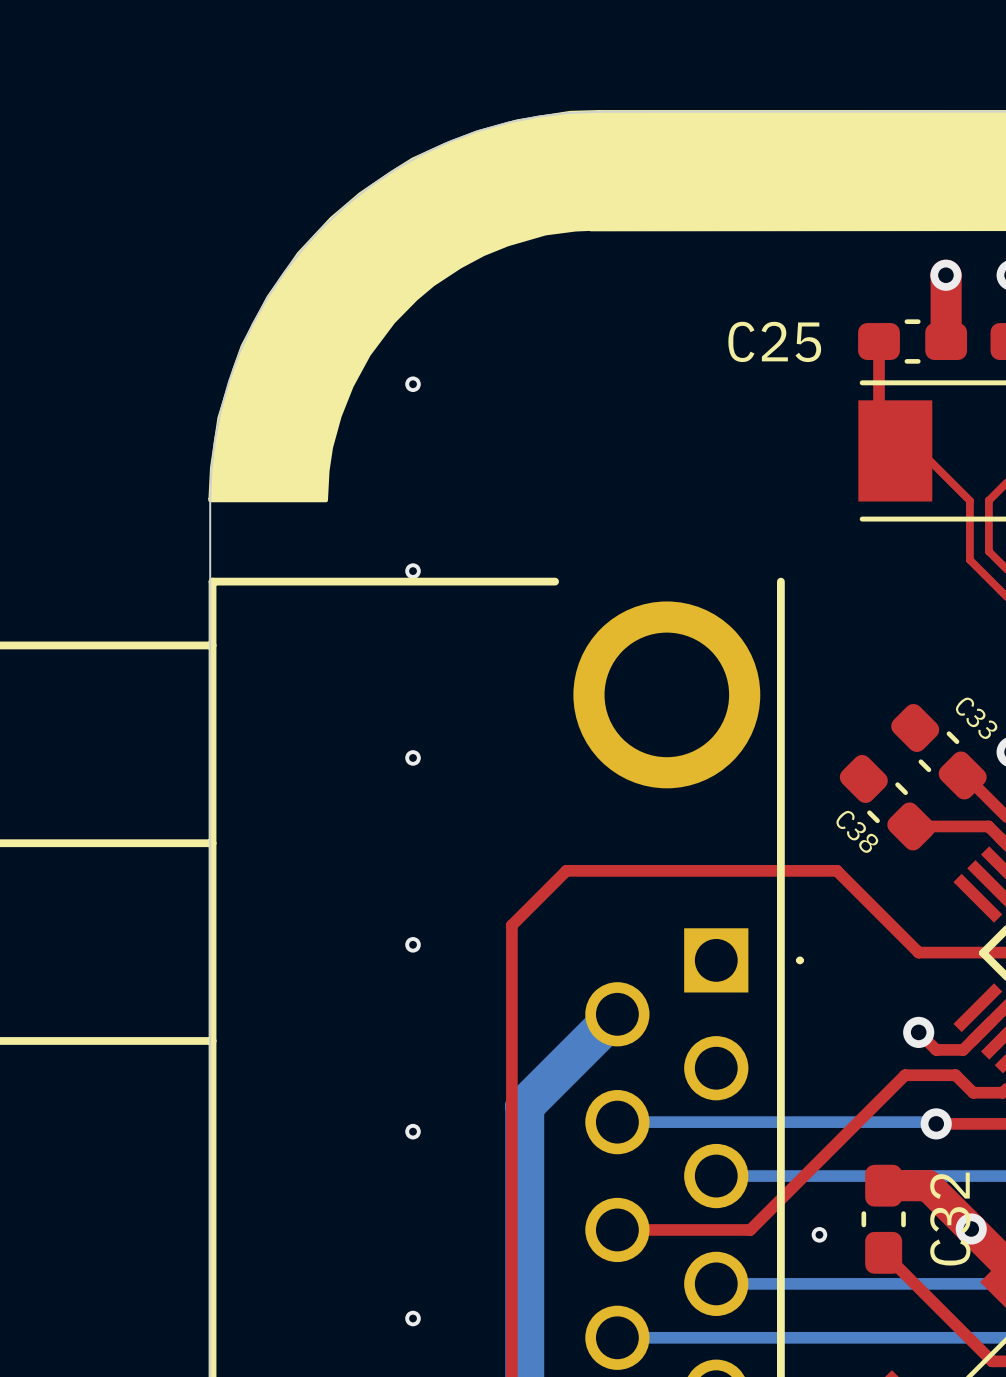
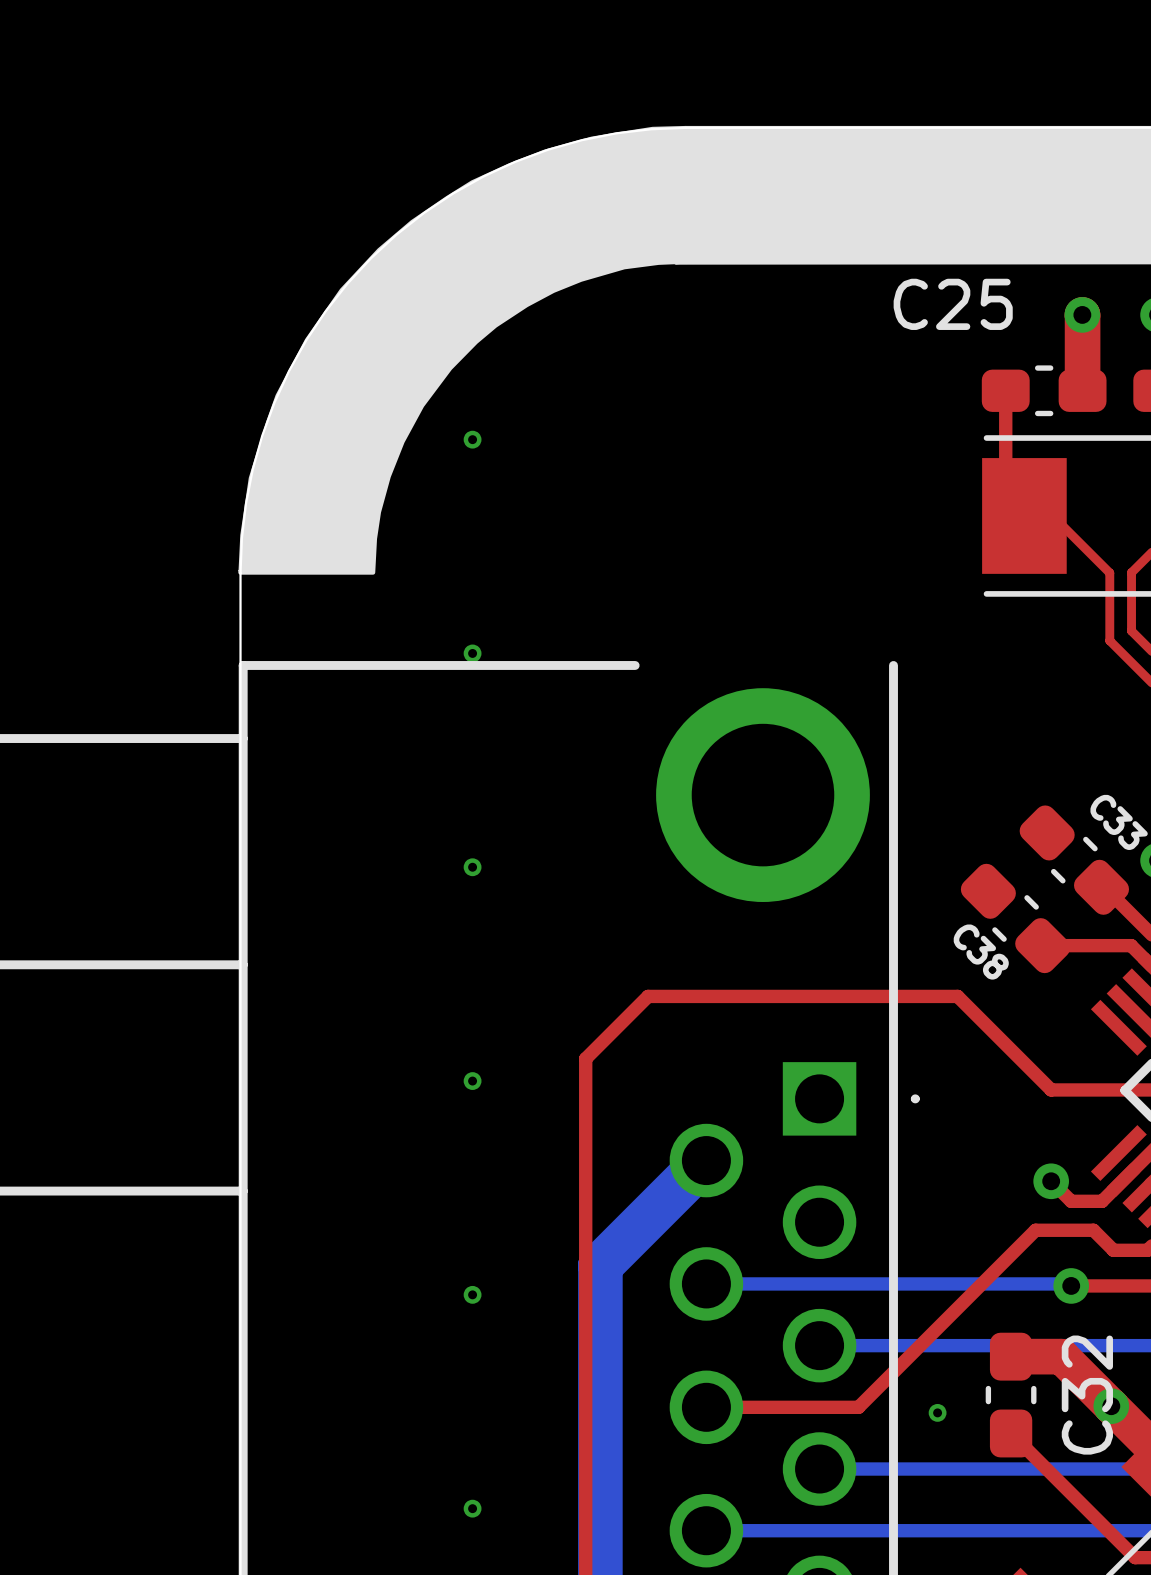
C25 name position: C25 (774, 341) -> C25 (953, 304)

